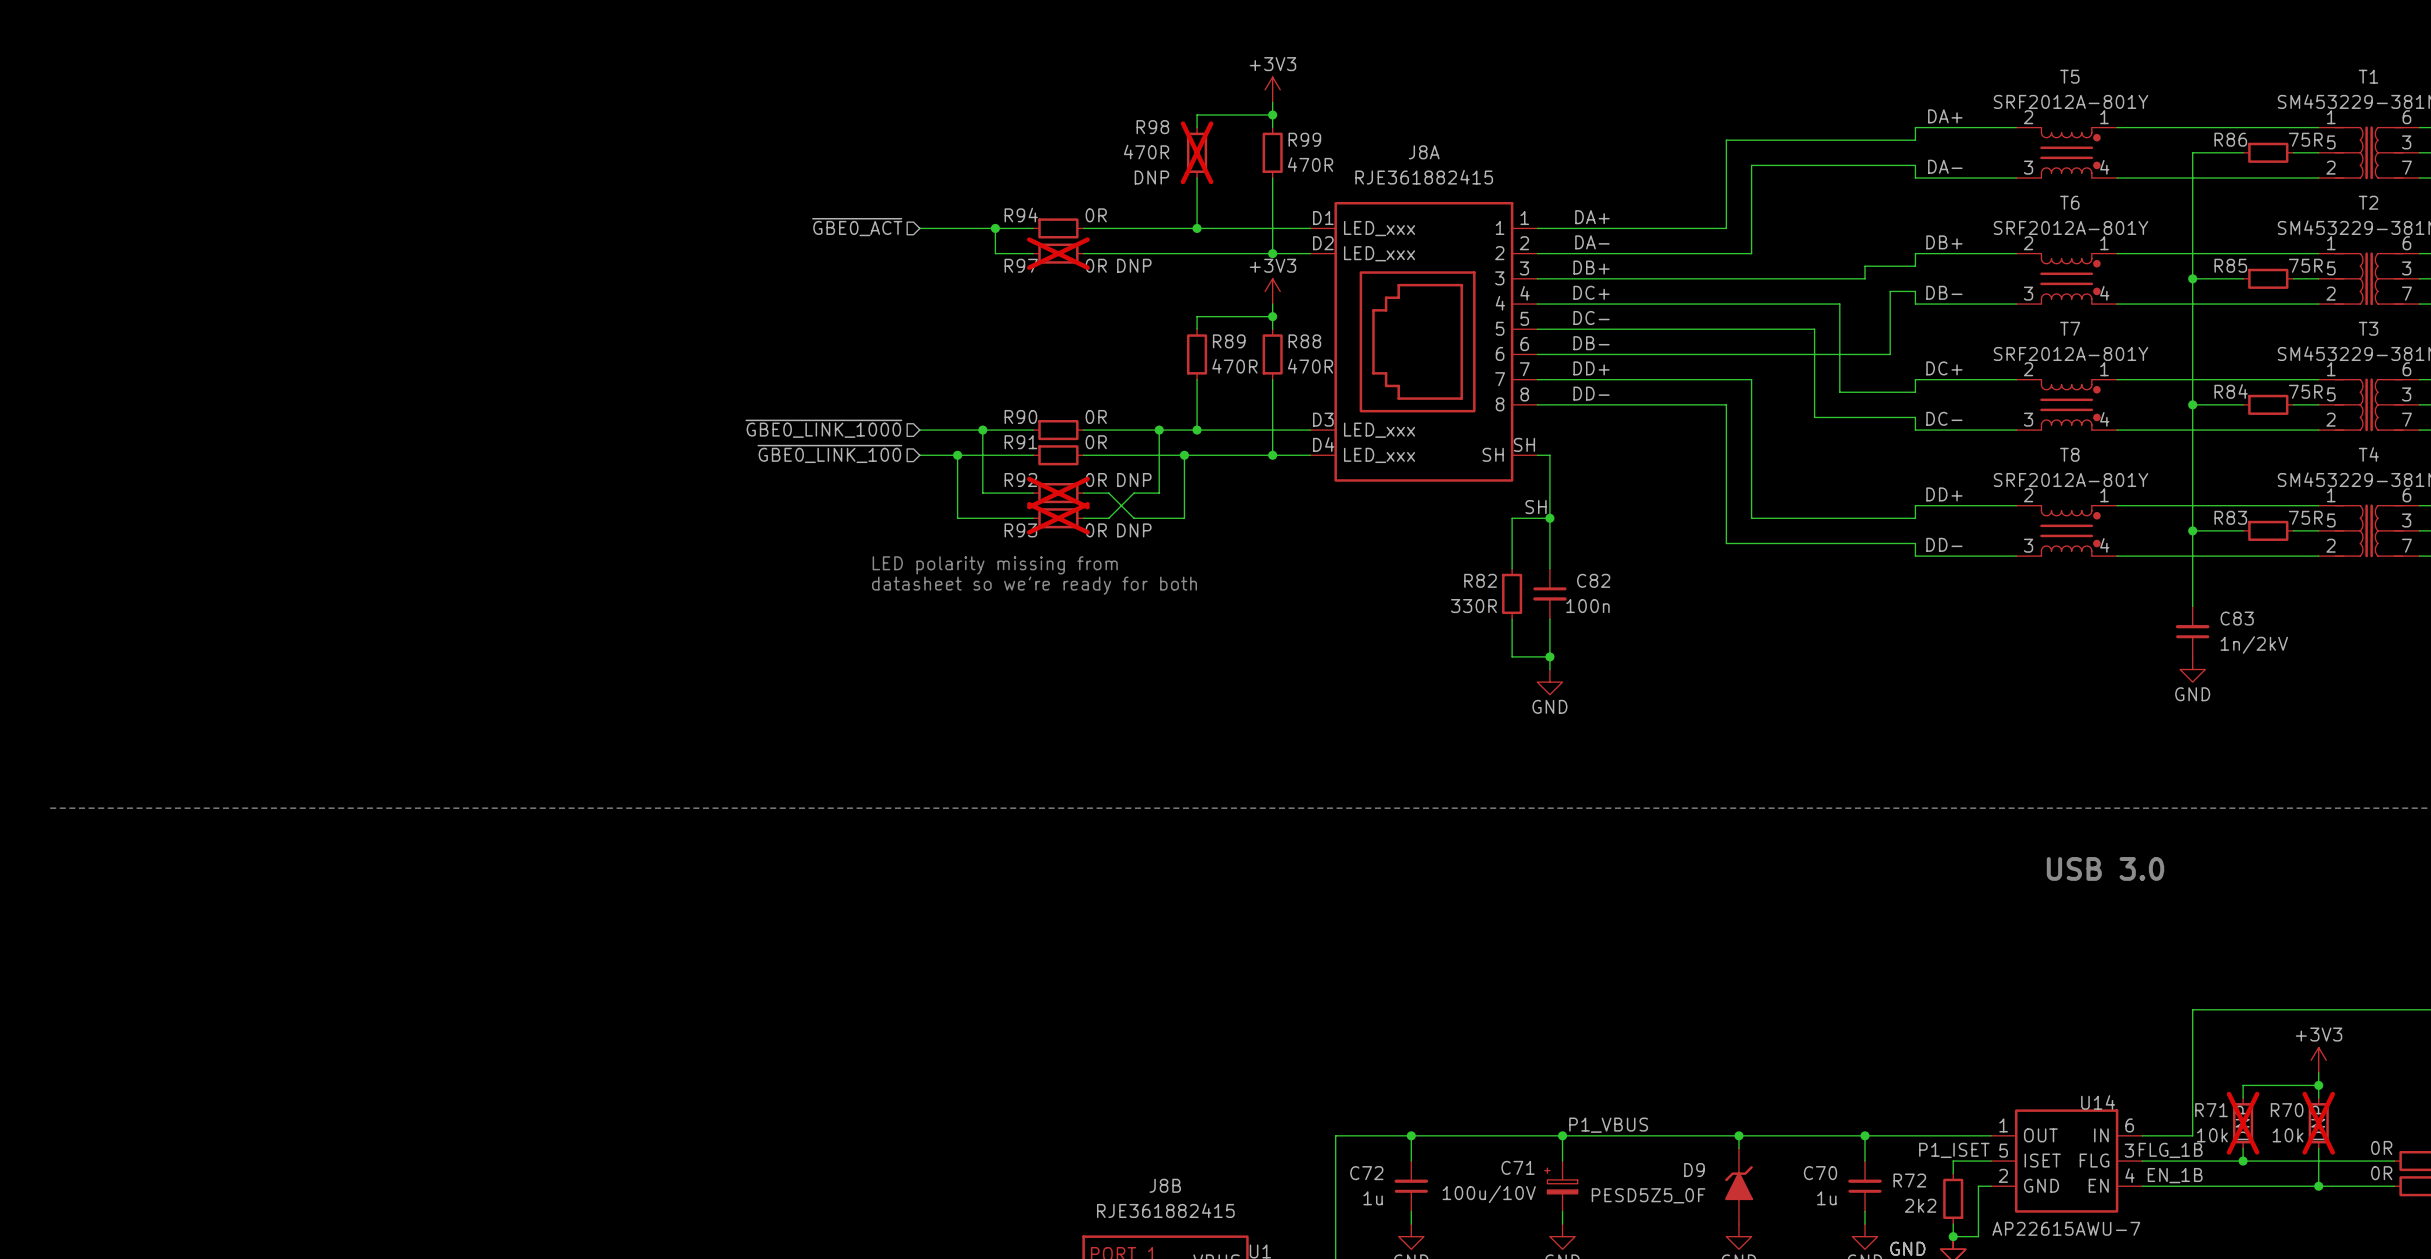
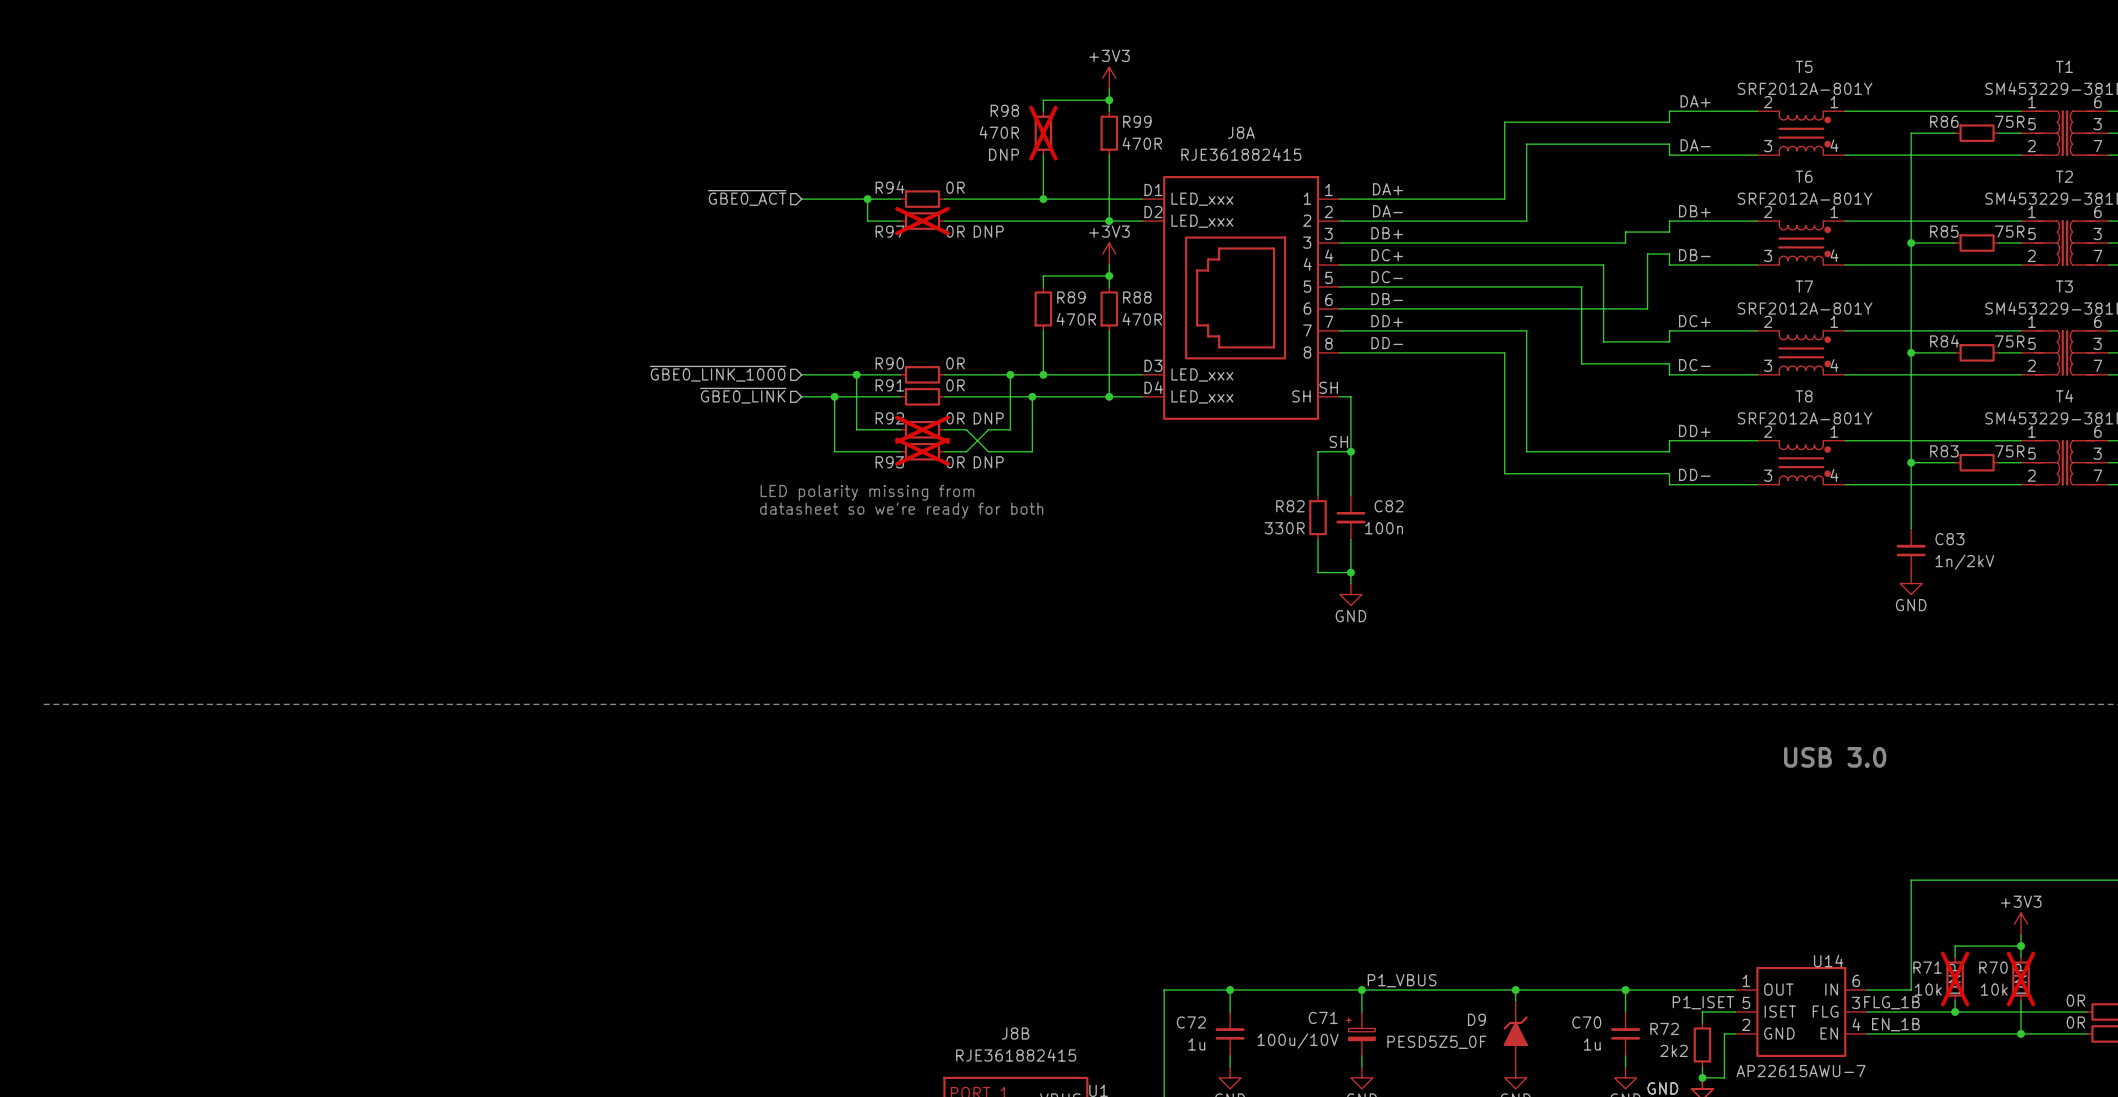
hierarchical label: ~{GBE0_LINK_100} (829, 453) -> ~{GBE0_LINK} (743, 395)

